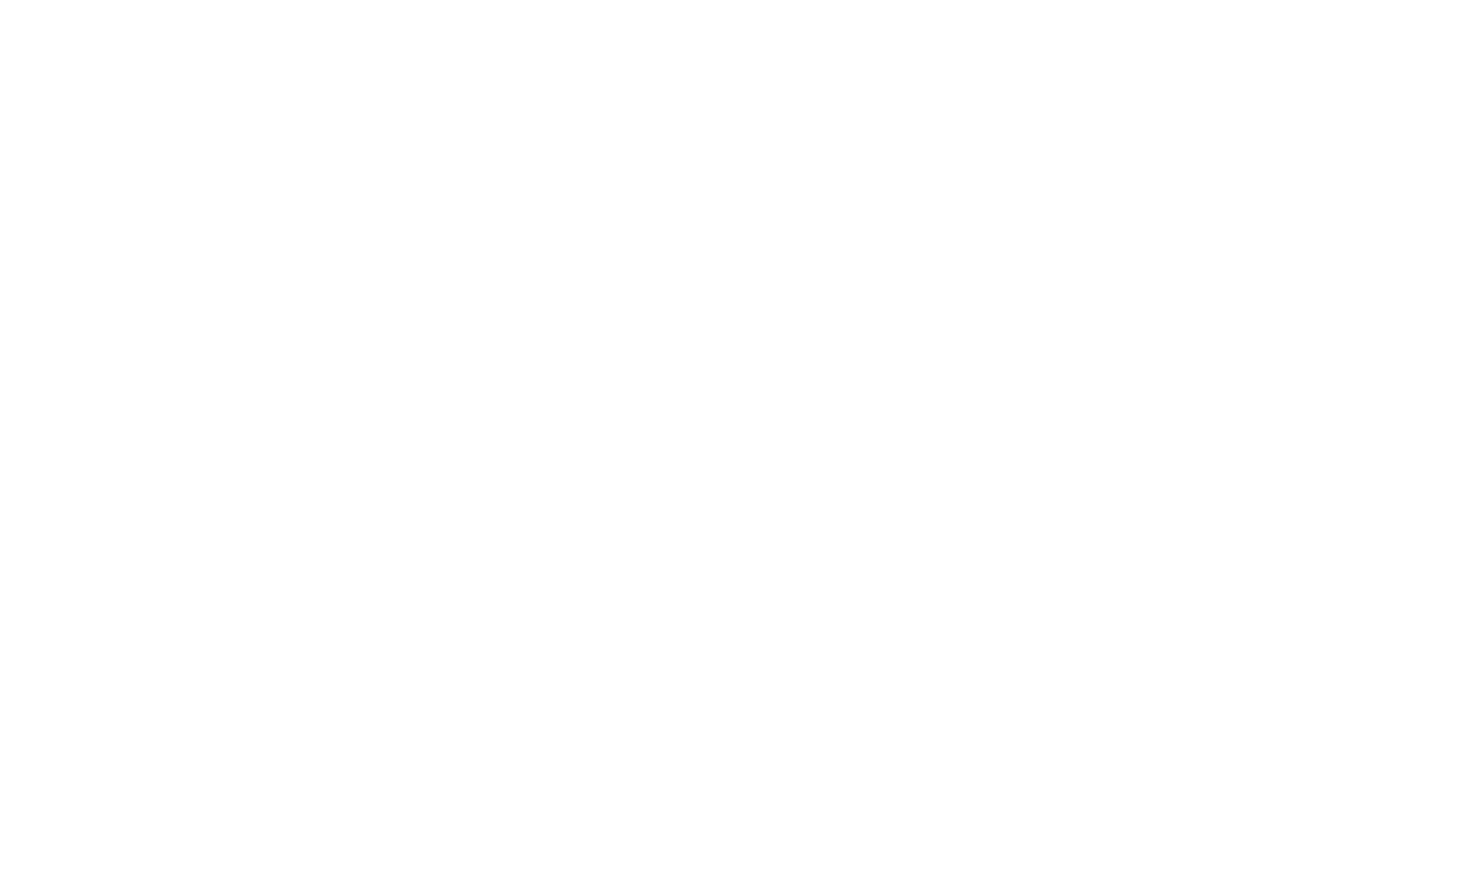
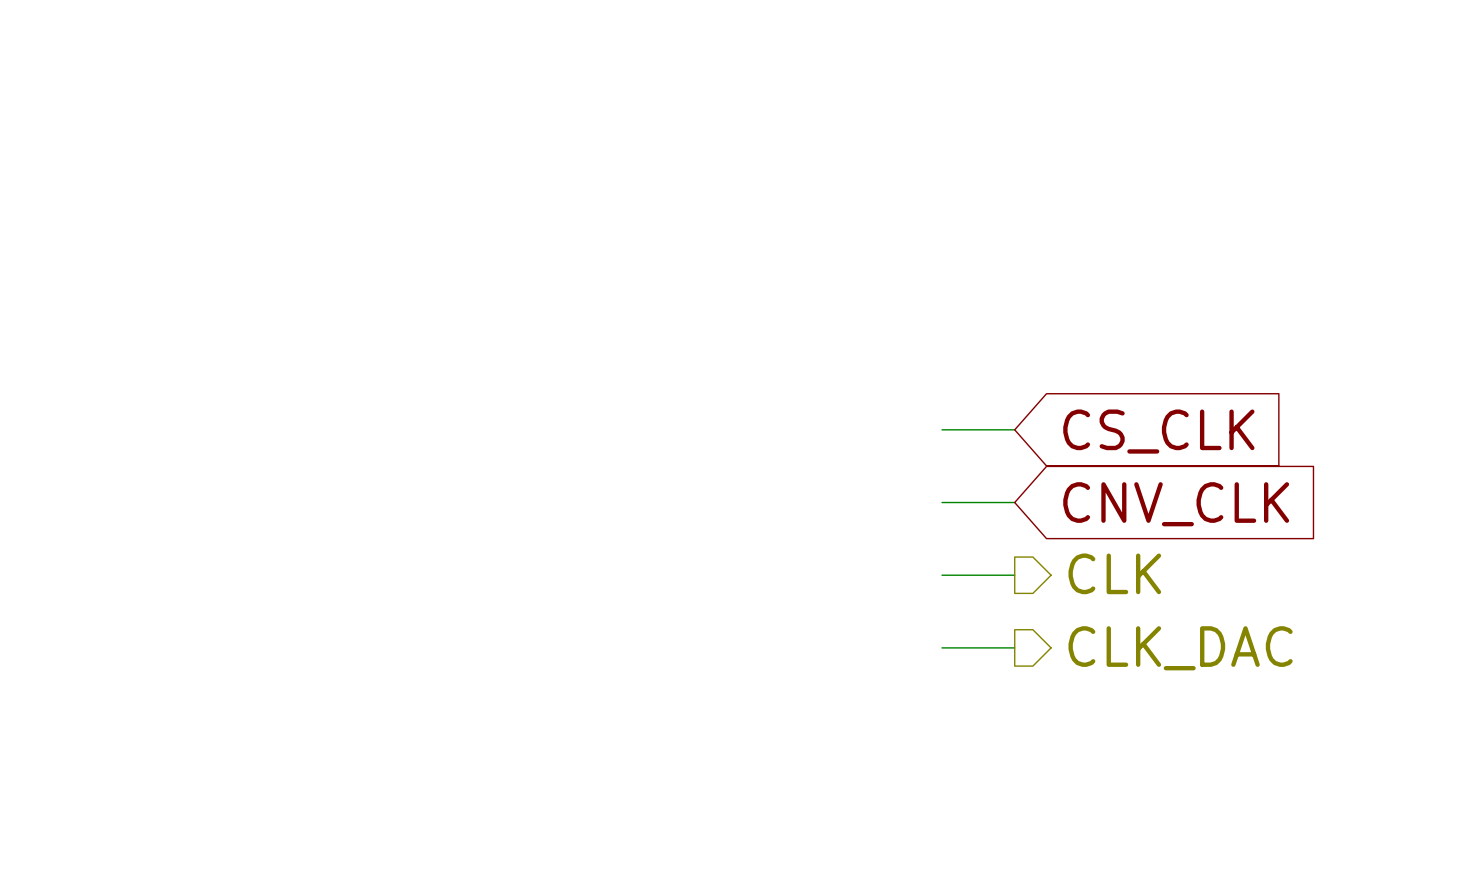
wire: none -> (942, 429) (1014, 429)
global label: none -> CS_CLK (1158, 431)
wire: none -> (942, 502) (1014, 502)
global label: none -> CNV_CLK (1176, 504)
hierarchical label: none -> CLK (1114, 573)
wire: none -> (942, 575) (1014, 575)
wire: none -> (942, 647) (1014, 647)
hierarchical label: none -> CLK_DAC (1180, 648)

